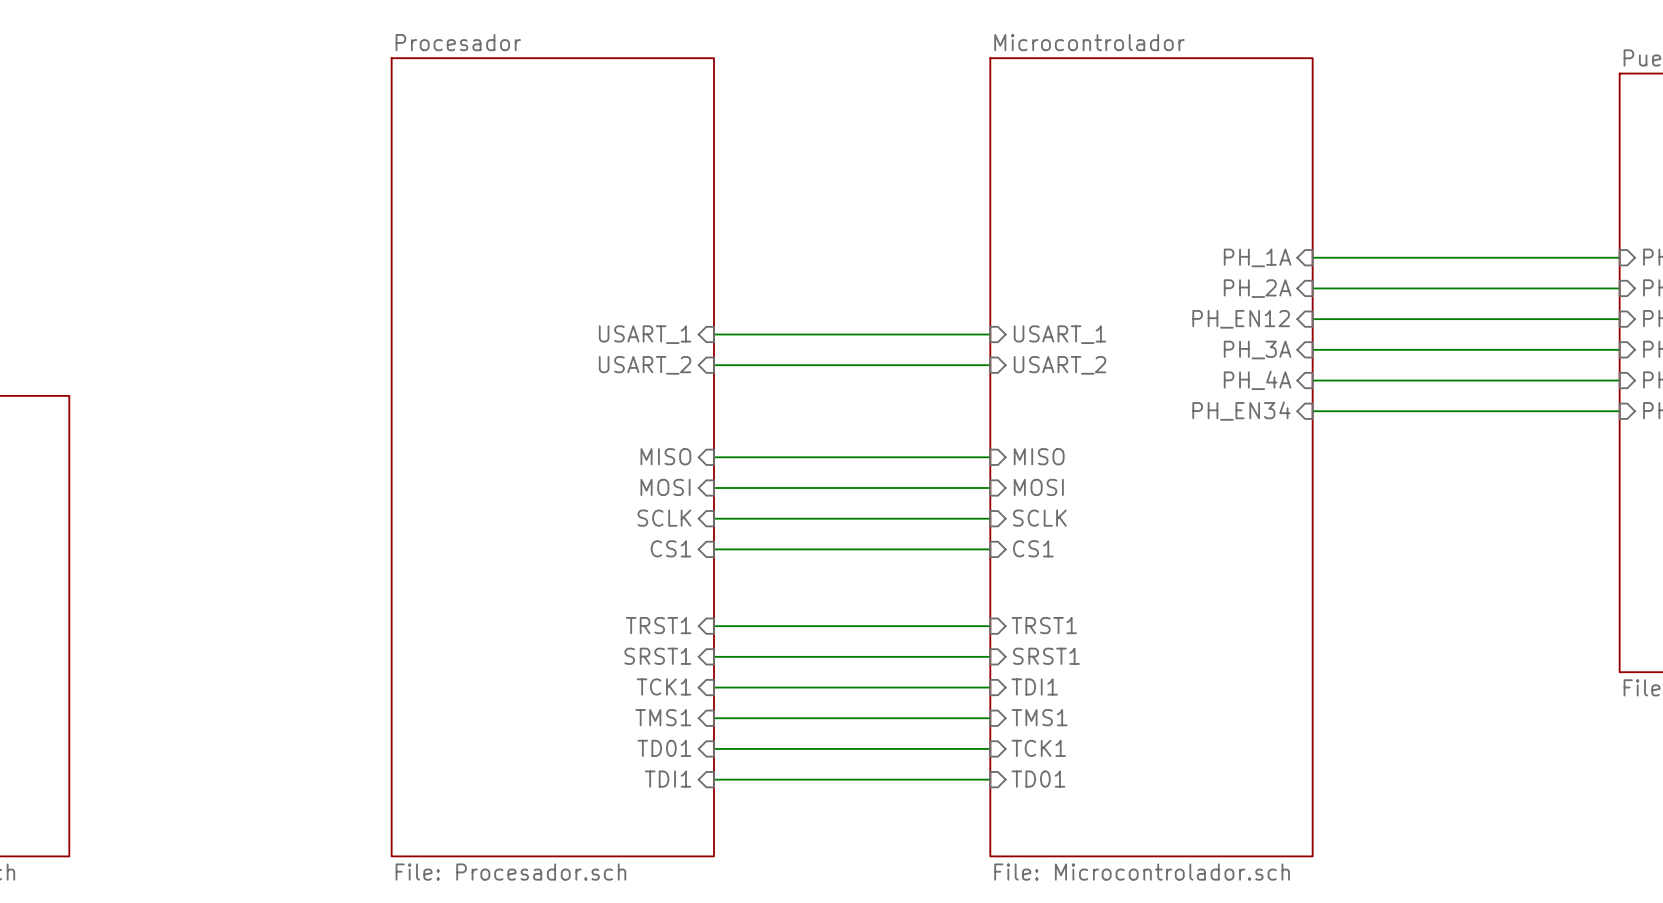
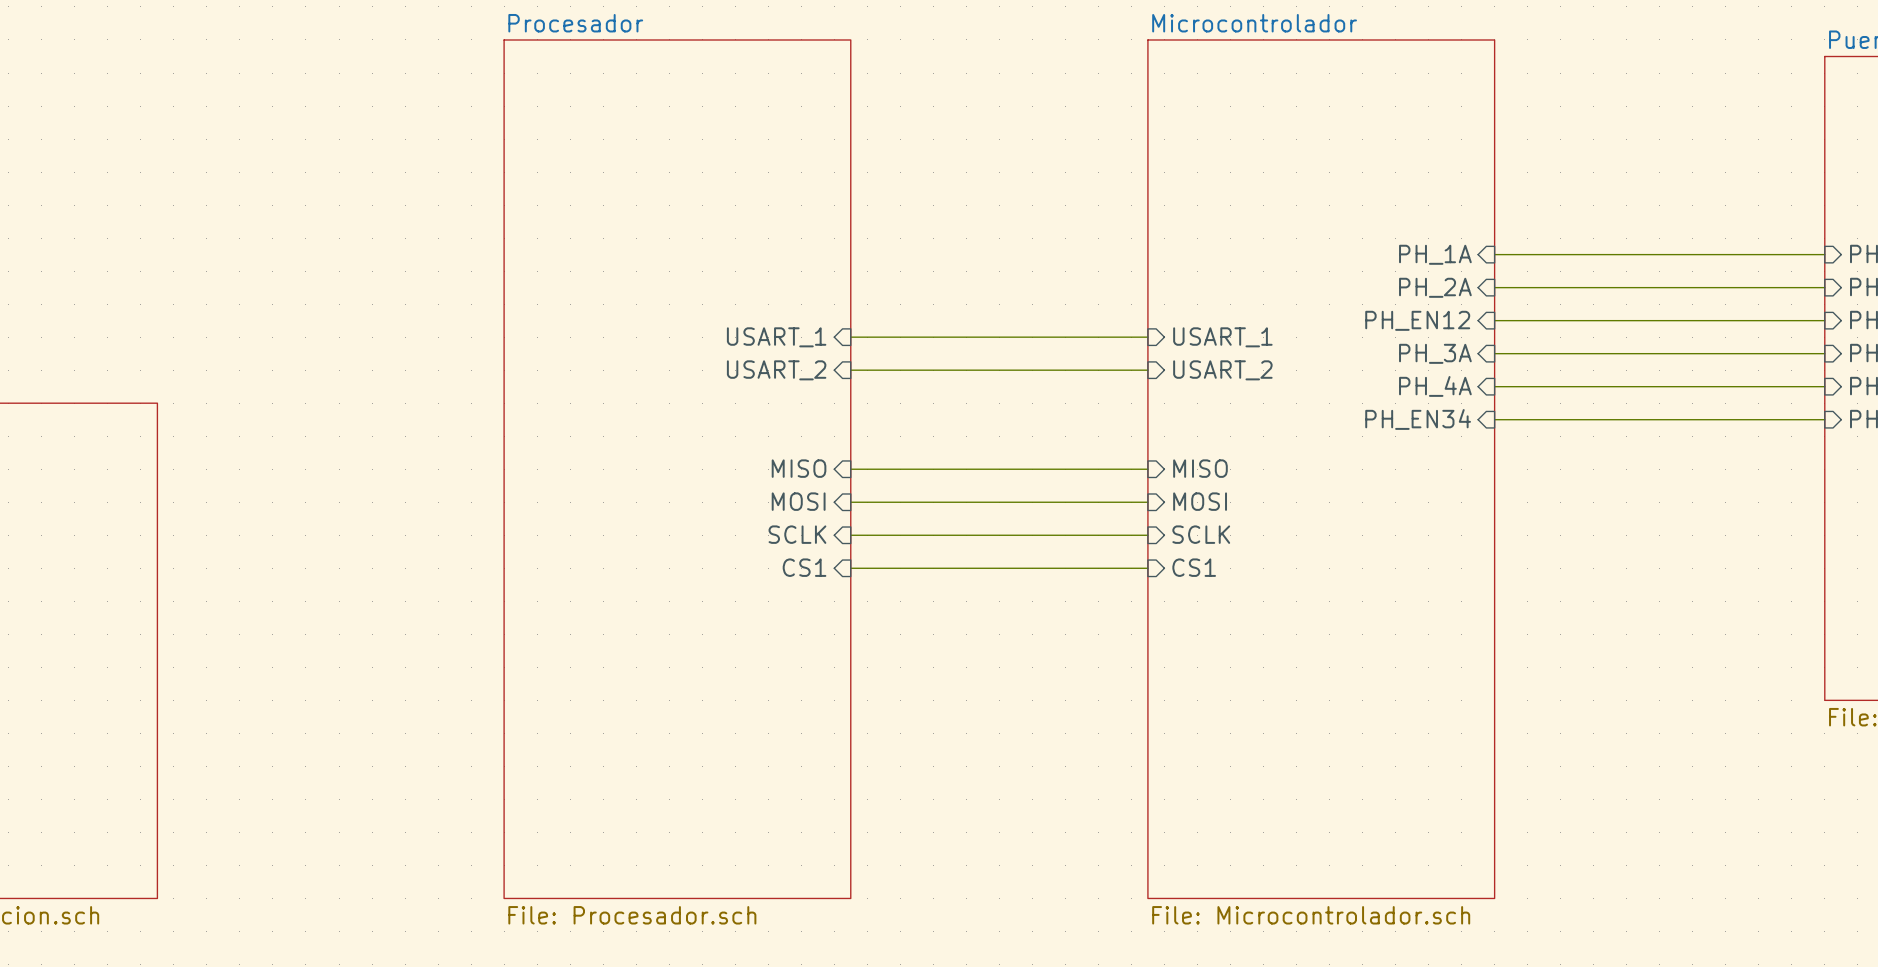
sheet pin: TRST1 (658, 625) -> none
sheet pin: TRST1 (1044, 625) -> none
wire: (714, 626) (990, 626) -> none
sheet pin: SRST1 (657, 656) -> none
wire: (714, 656) (990, 656) -> none
sheet pin: SRST1 (1046, 656) -> none
sheet pin: TCK1 (664, 686) -> none
sheet pin: TDI1 (1034, 686) -> none
wire: (714, 687) (990, 687) -> none
sheet pin: TMS1 (663, 717) -> none
sheet pin: TMS1 (1039, 717) -> none
wire: (714, 718) (990, 718) -> none
sheet pin: TD01 (664, 748) -> none
wire: (714, 748) (990, 748) -> none
sheet pin: TCK1 (1038, 748) -> none
sheet pin: TDI1 (668, 779) -> none
wire: (714, 779) (990, 779) -> none
sheet pin: TD01 (1038, 779) -> none

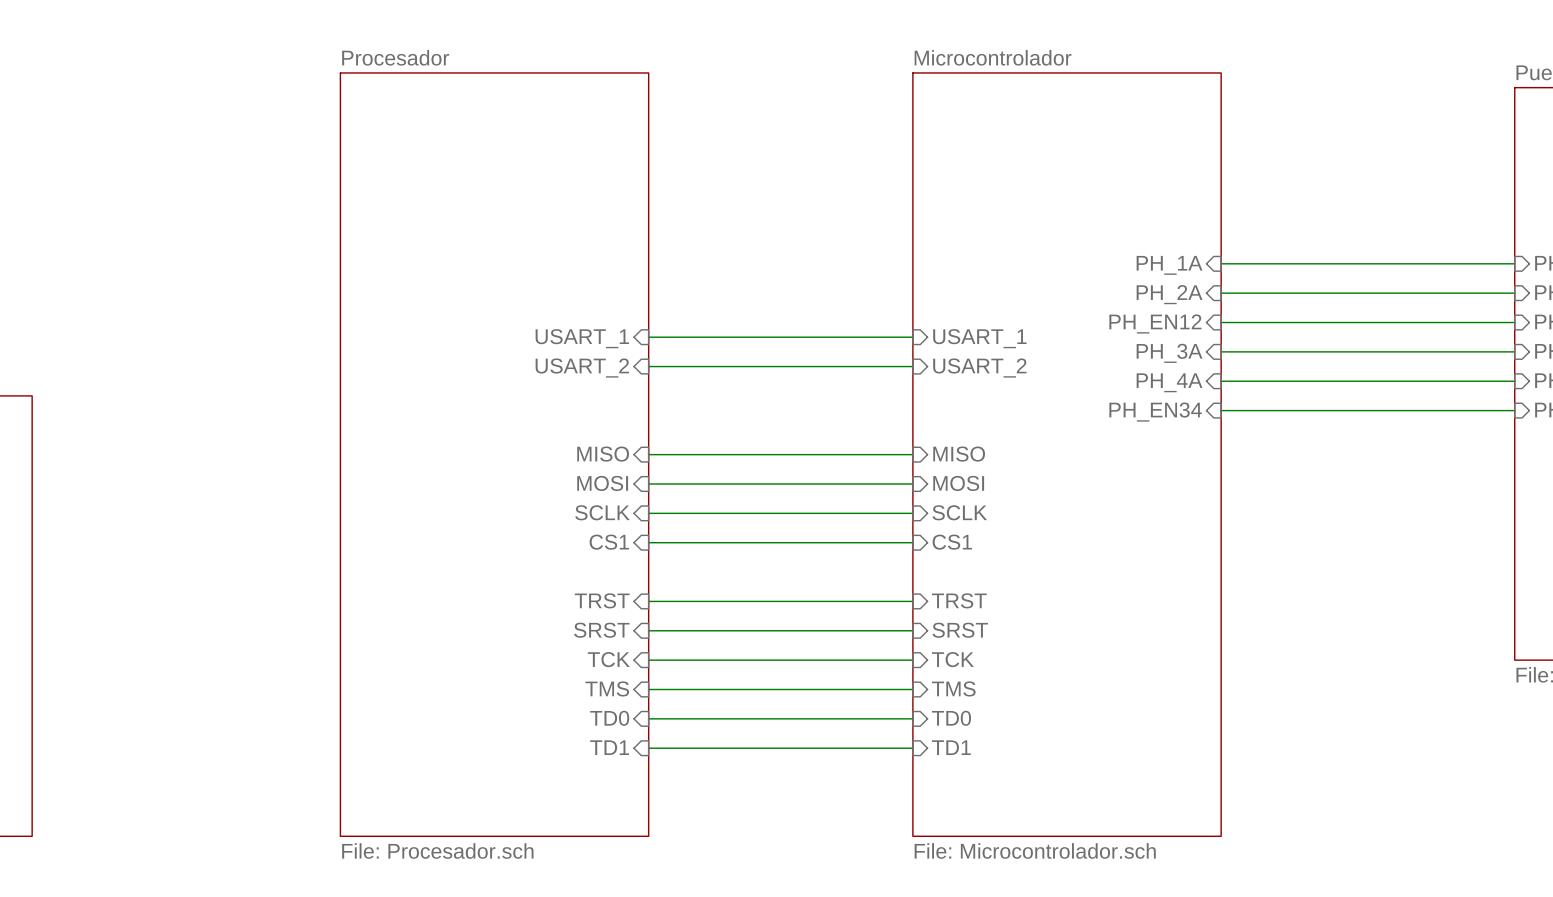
sheet pin: none -> TRST (602, 600)
sheet pin: none -> TRST (959, 600)
wire: none -> (648, 601) (912, 601)
sheet pin: none -> SRST (601, 630)
sheet pin: none -> SRST (960, 630)
wire: none -> (648, 630) (912, 630)
sheet pin: none -> TCK (608, 659)
sheet pin: none -> TCK (952, 659)
wire: none -> (648, 660) (912, 660)
sheet pin: none -> TMS (607, 688)
sheet pin: none -> TMS (953, 688)
wire: none -> (648, 689) (912, 689)
sheet pin: none -> TD0 (609, 718)
sheet pin: none -> TD0 (951, 718)
wire: none -> (648, 718) (912, 718)
sheet pin: none -> TD1 (609, 747)
sheet pin: none -> TD1 (951, 747)
wire: none -> (648, 748) (912, 748)

